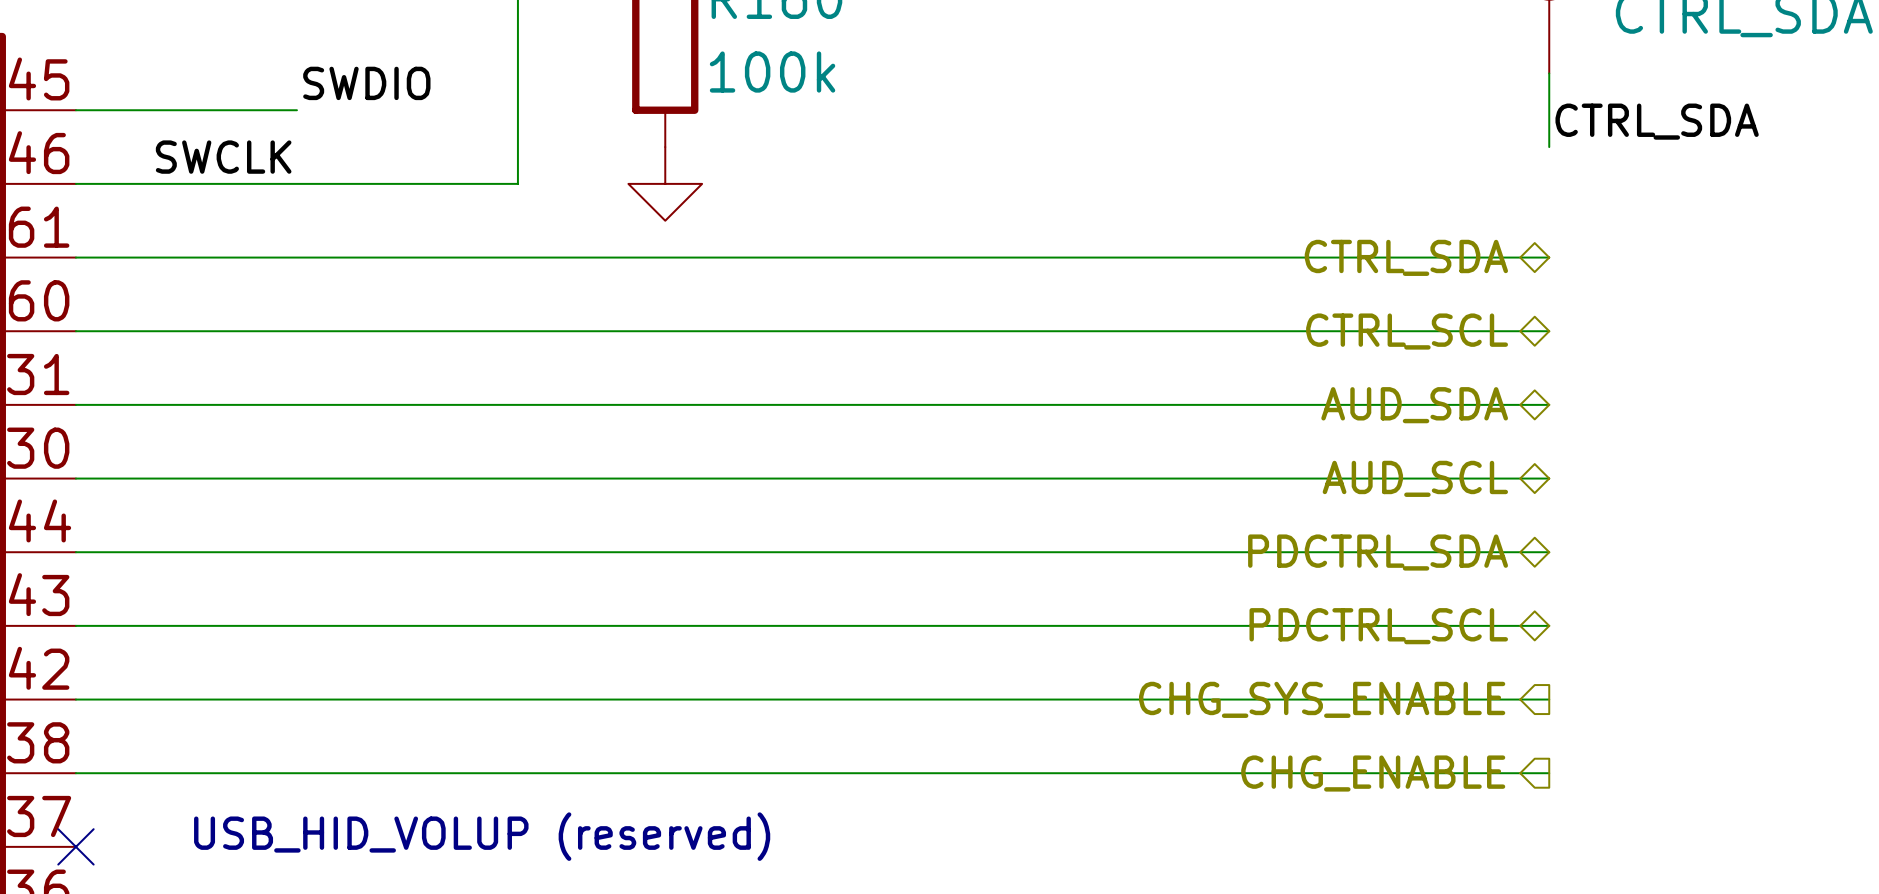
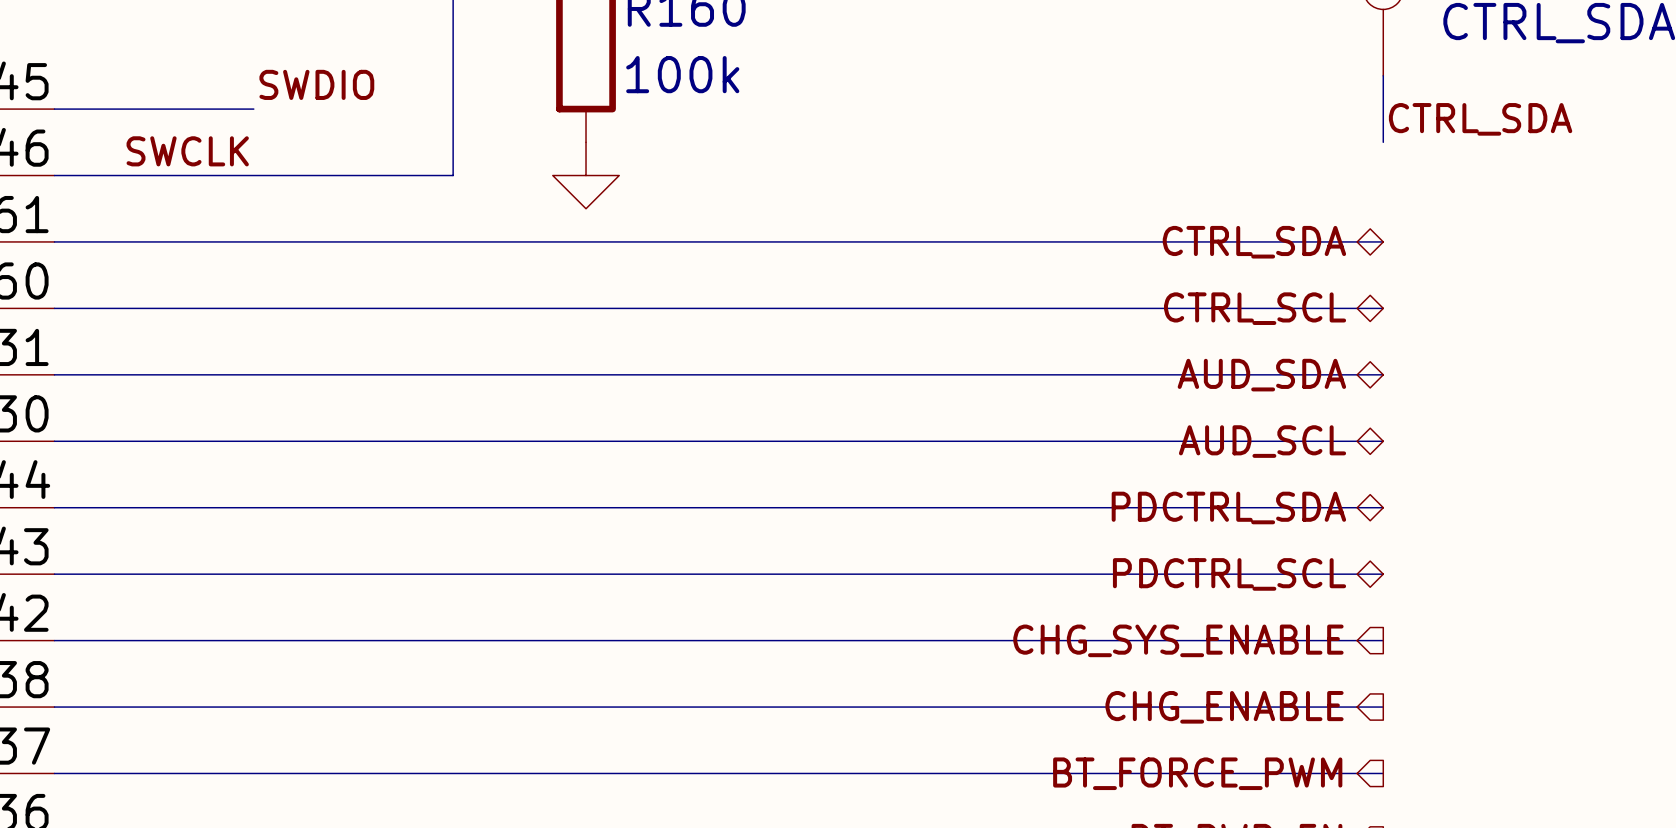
text: USB_HID_VOLUP (reserved) (482, 836) -> none
wire: none -> (54, 773) (1383, 773)
no-connect mark: (75, 846) -> none
hierarchical label: none -> BT_FORCE_PWM (1197, 773)

